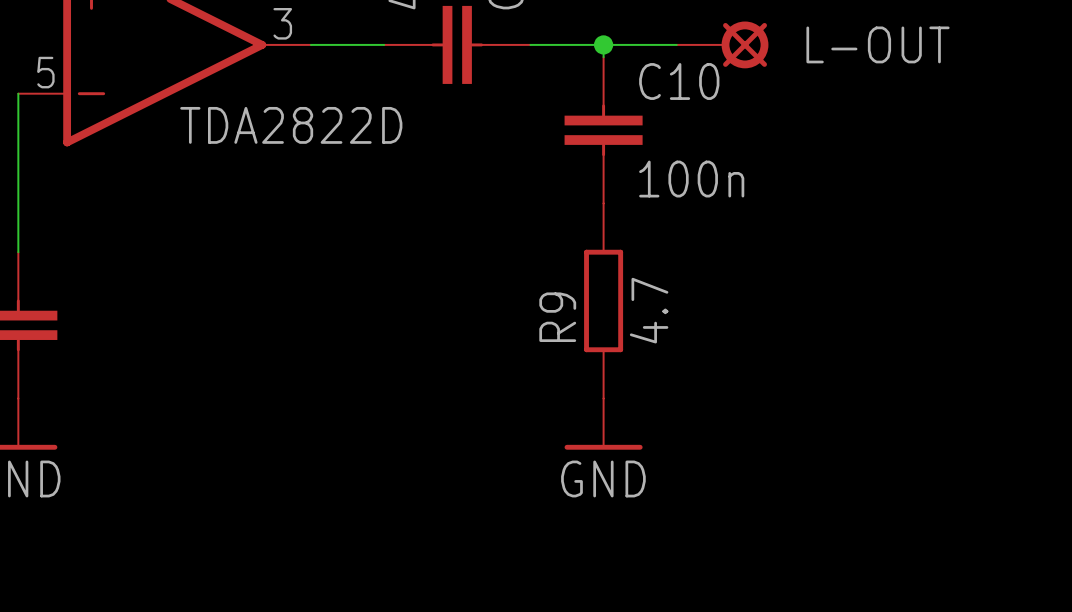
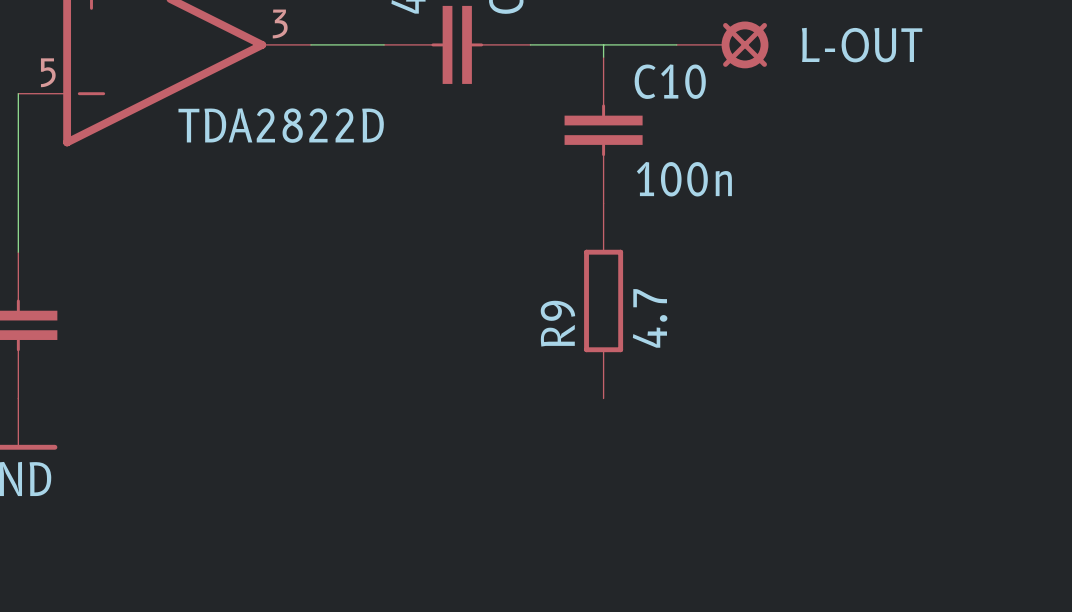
junction: (603, 44) -> none
power symbol: GND (603, 424) -> none

